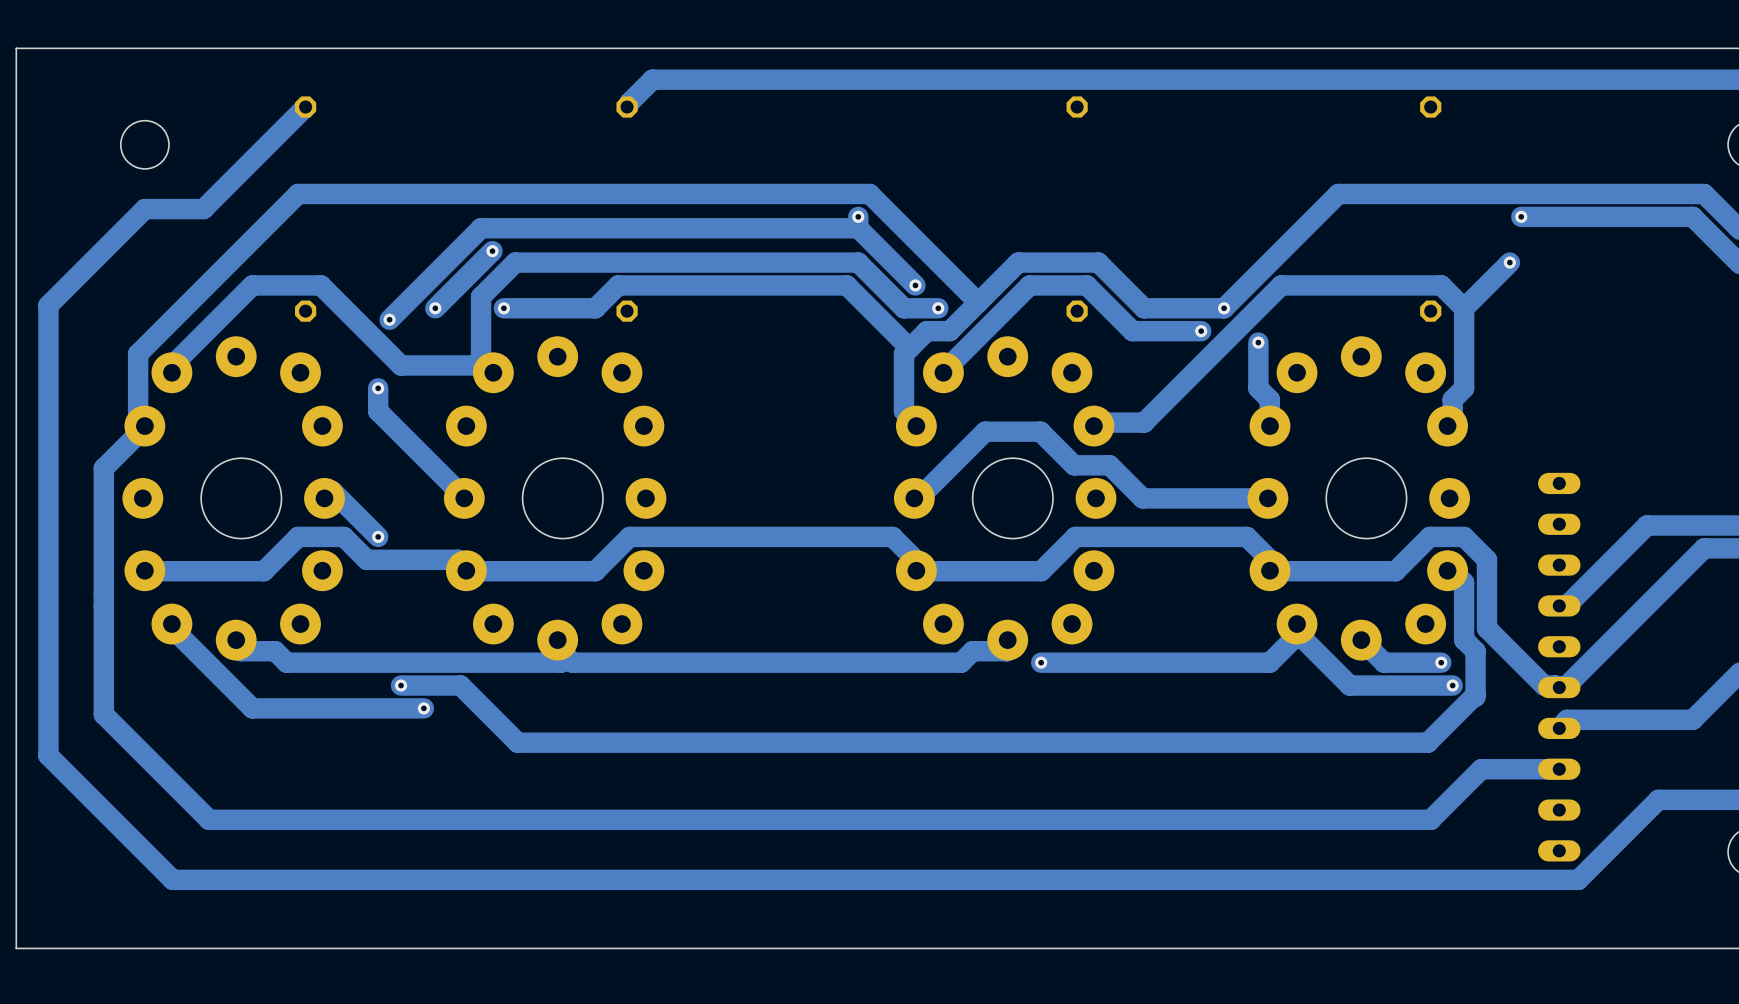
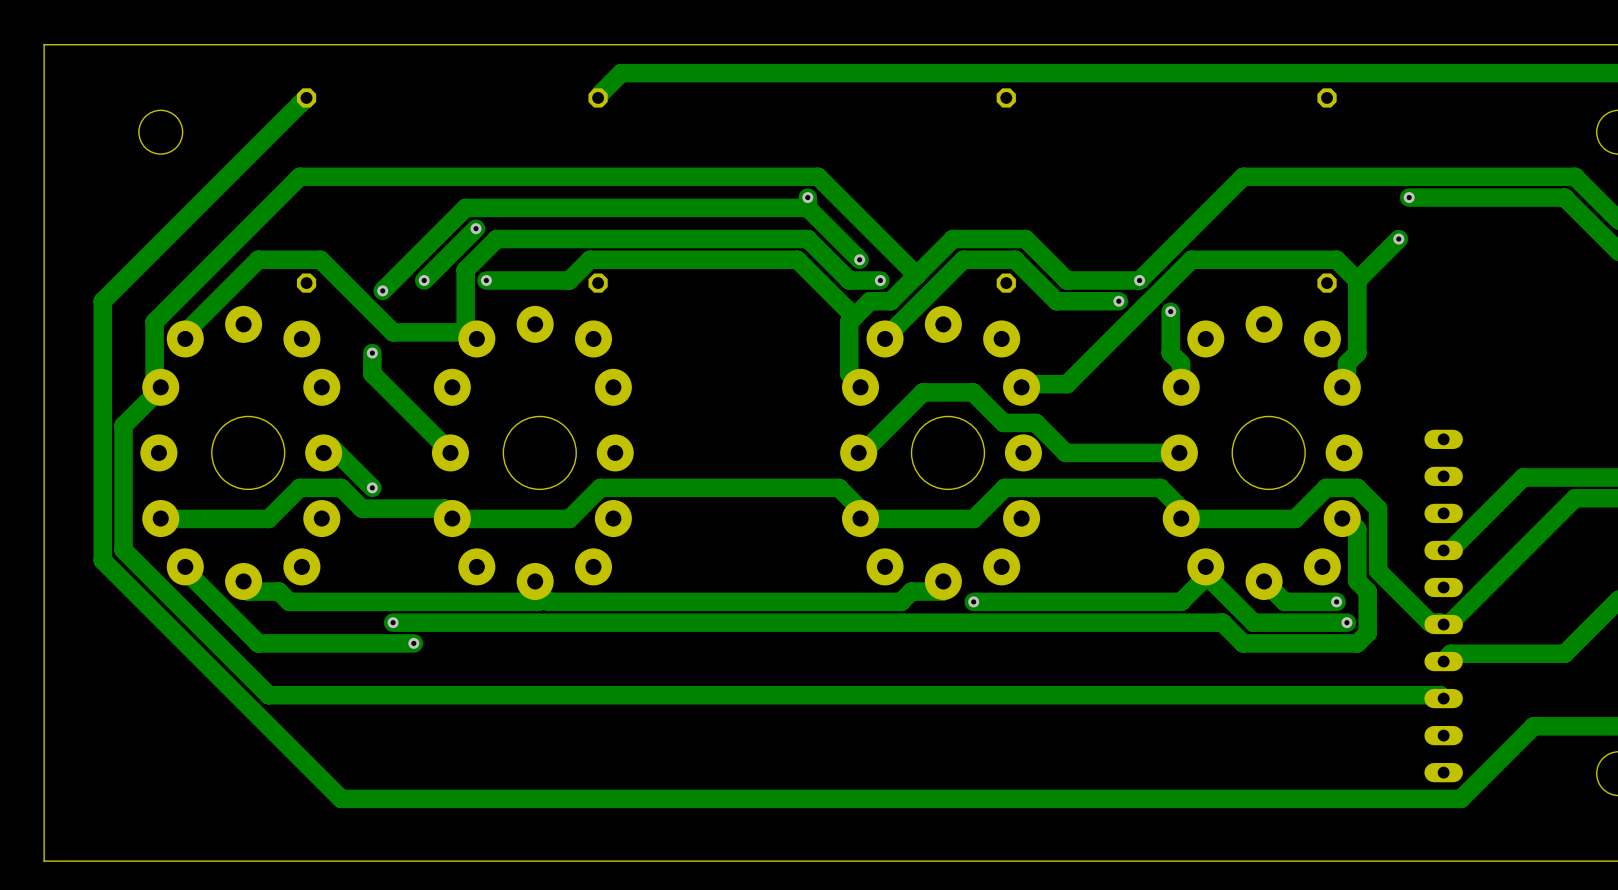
track: (305, 107) (203, 209) (144, 209) (48, 305) (48, 755) (172, 879) (343, 879) -> (306, 97) (102, 301) (102, 560) (341, 798)
track: (103, 605) (103, 714) (209, 819) (1430, 819) (1481, 769) (1559, 769) -> (123, 550) (268, 695) (1440, 695) (1443, 698)
track: (460, 685) (517, 742) (1427, 742) (1475, 695) -> (447, 622) (1222, 622) (1243, 643) (1357, 643) (1367, 633)

